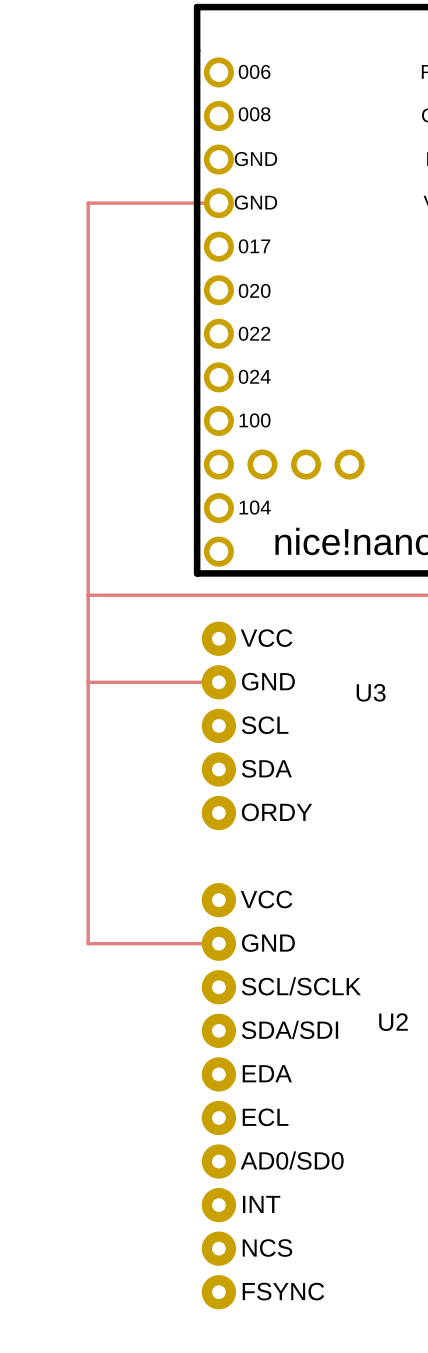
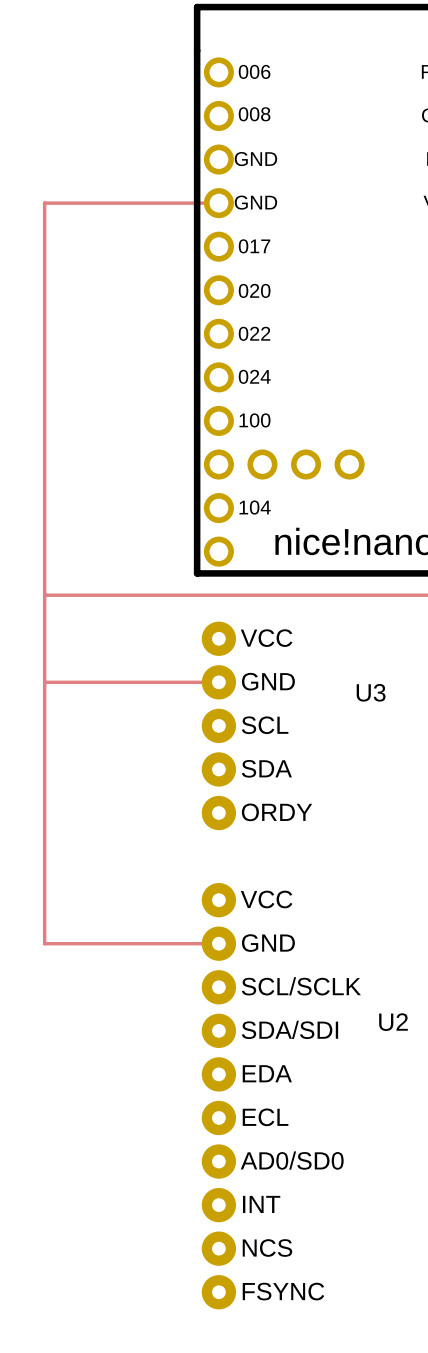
top track: (88, 203) (88, 943) -> (88, 203) (44, 203) (44, 943) (88, 943)
top track: none -> (44, 595) (88, 595)
top track: none -> (44, 682) (88, 682)

